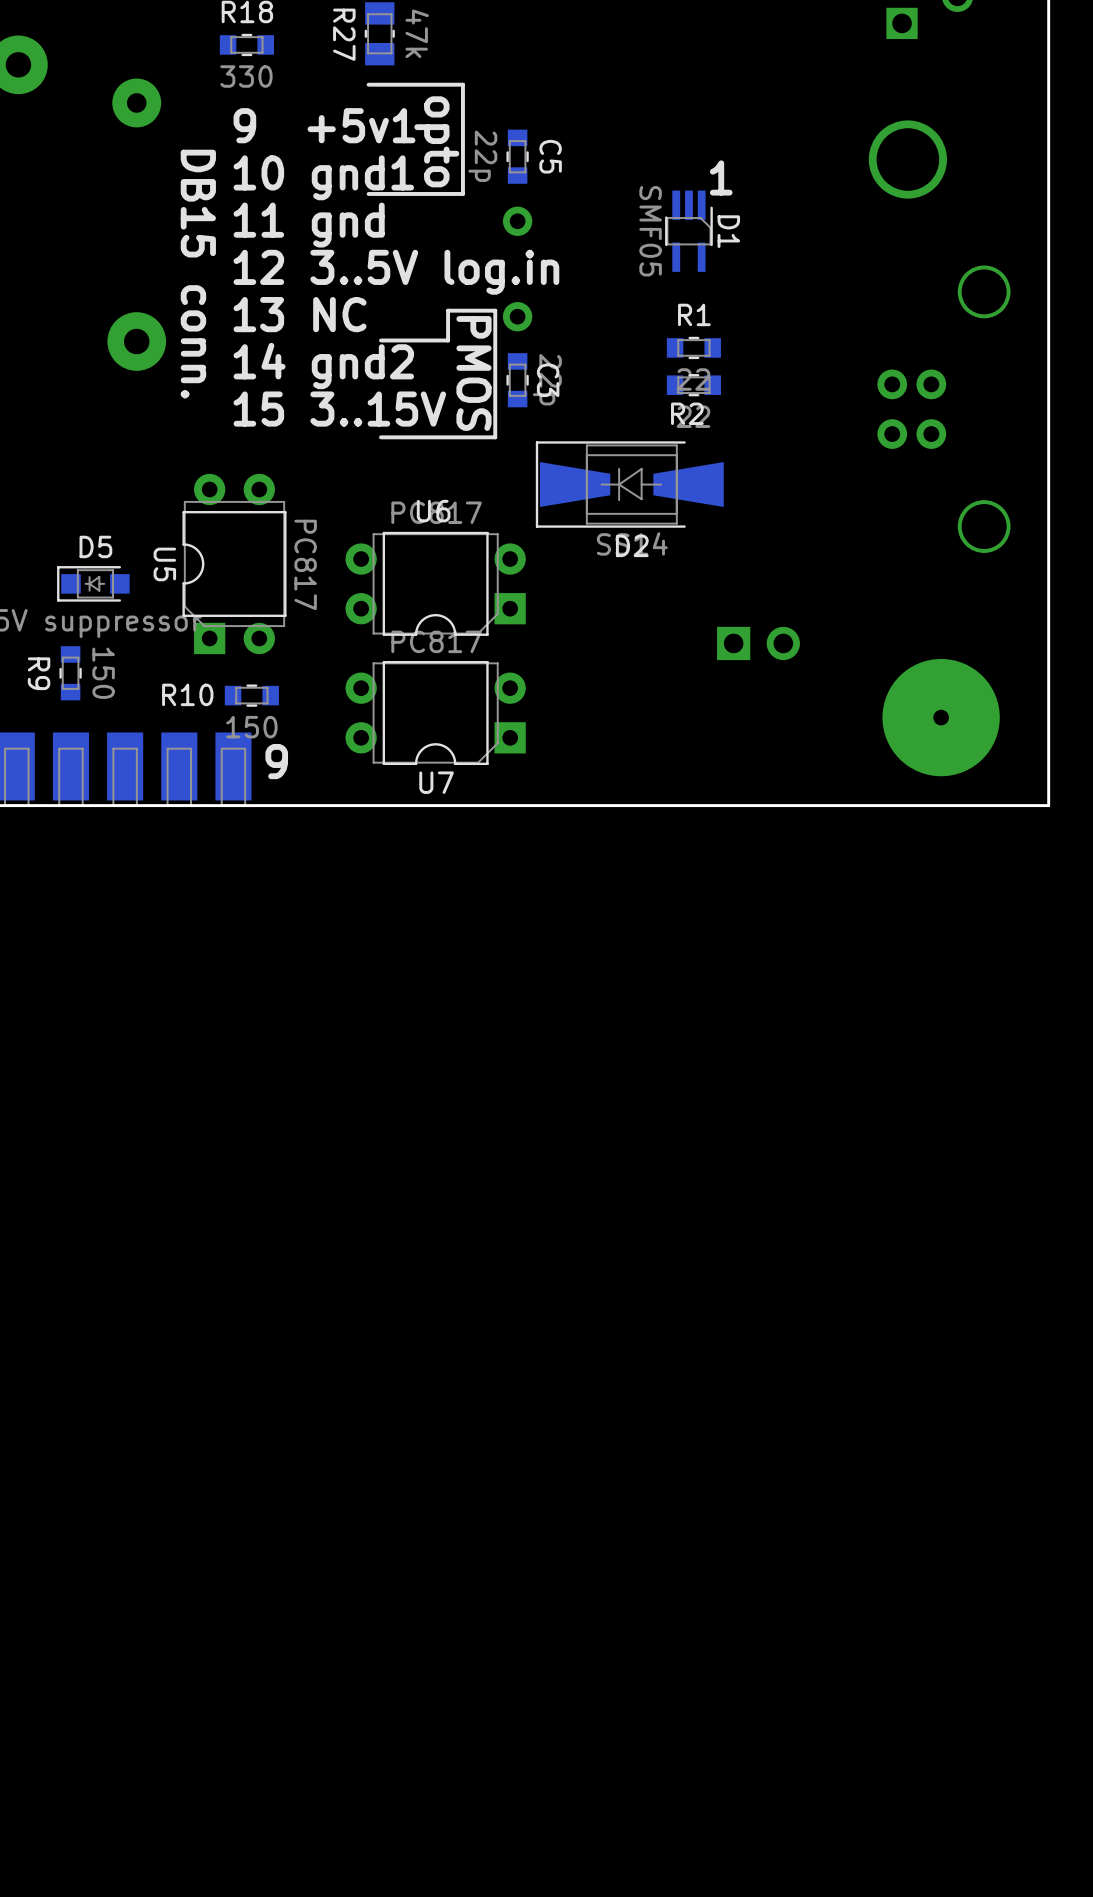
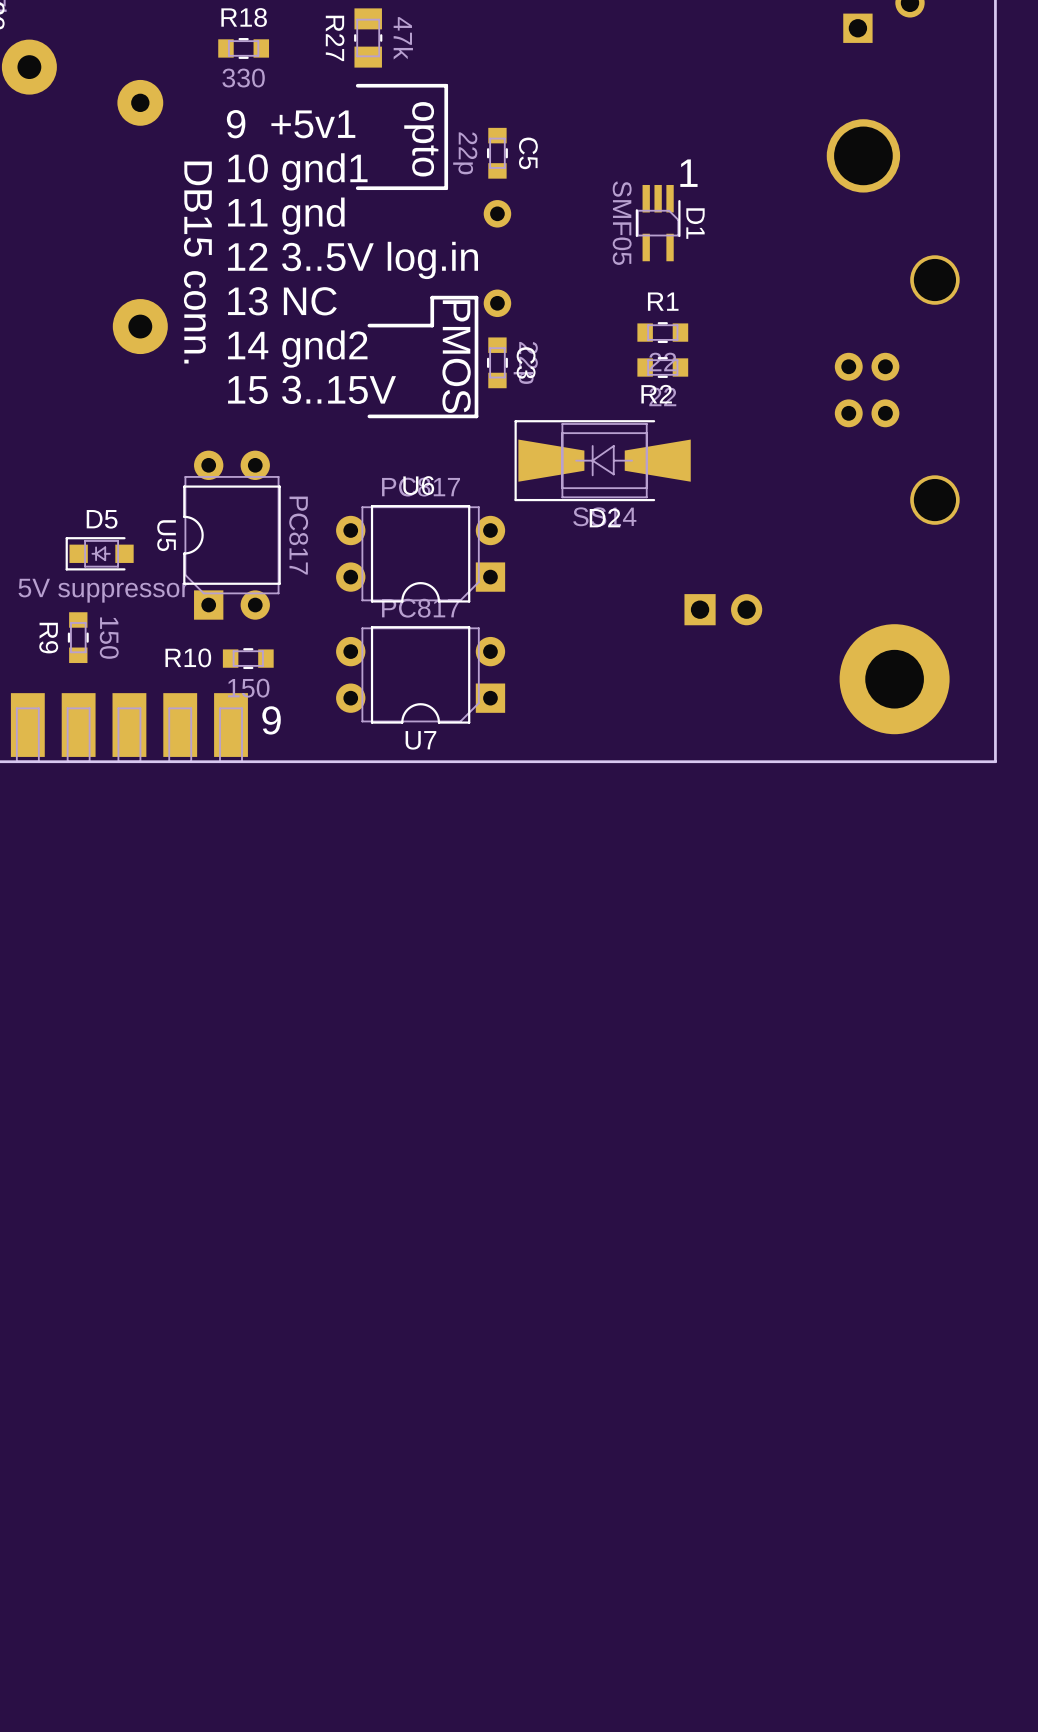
part footprint: [882, 658, 1000, 777] -> [839, 624, 950, 735]

